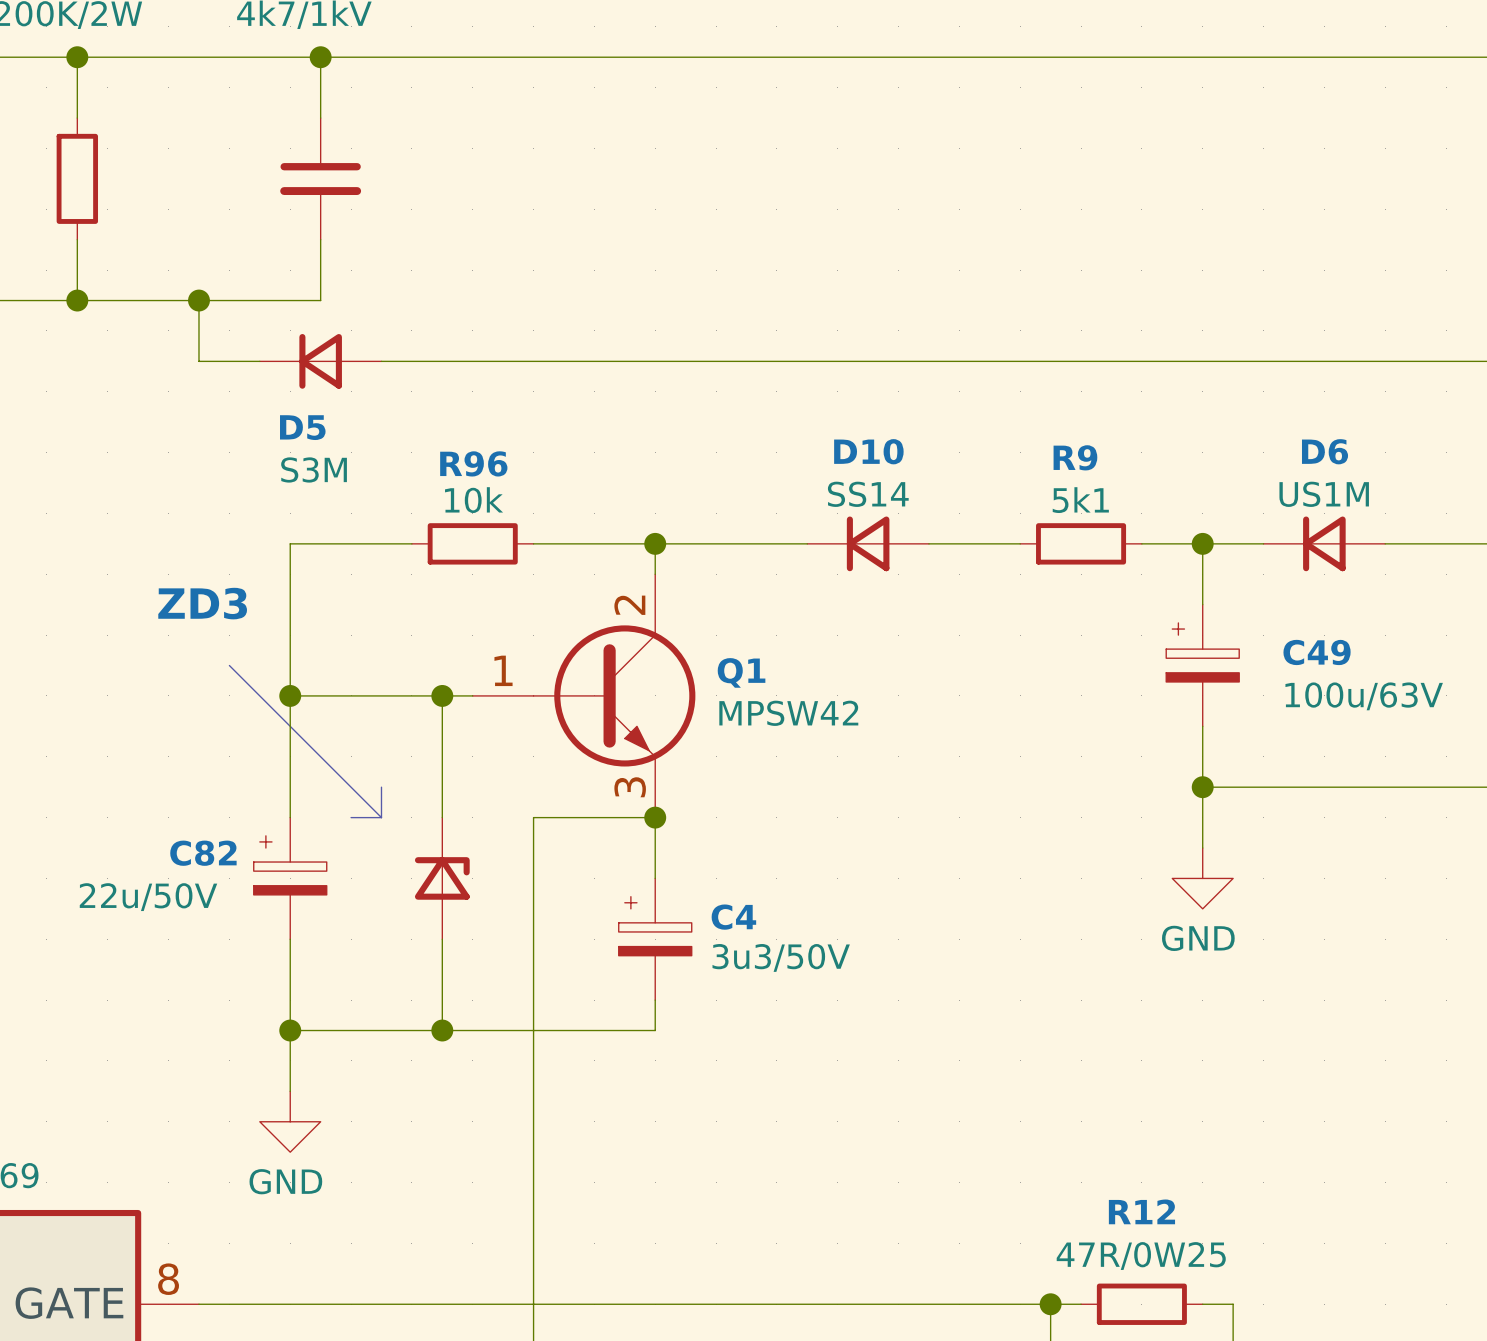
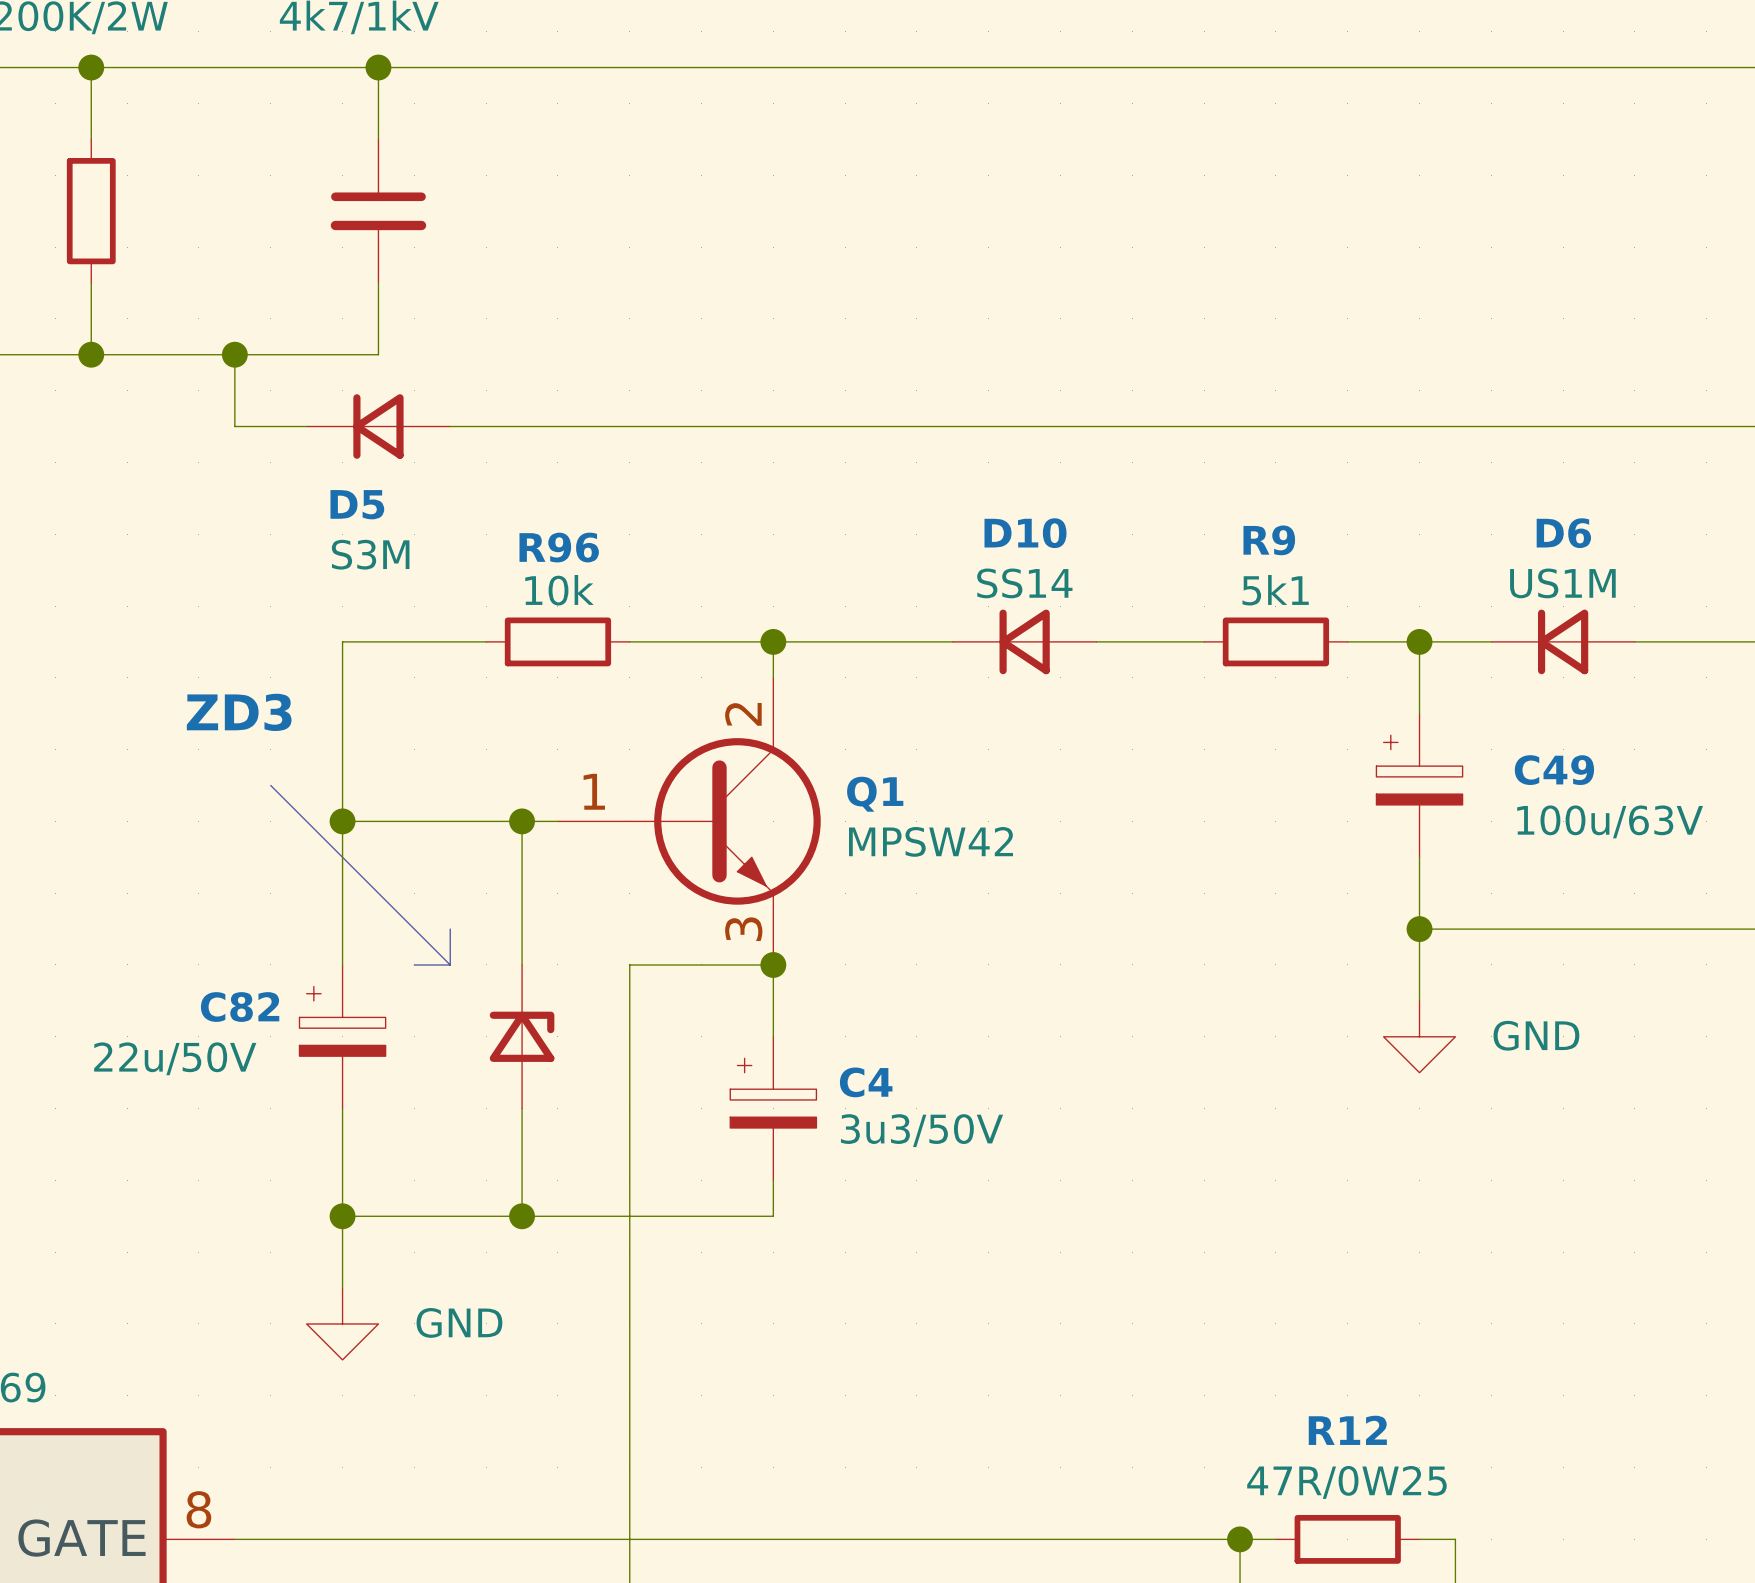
power symbol text position: GND (1198, 938) -> GND (1536, 1035)
power symbol text position: GND (285, 1181) -> GND (459, 1322)

